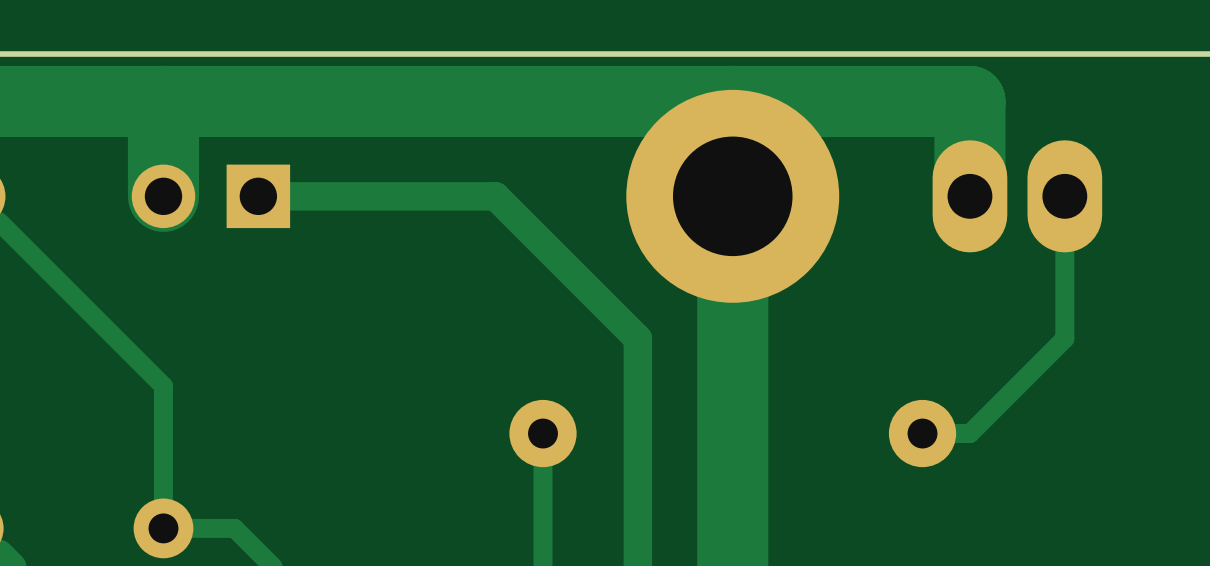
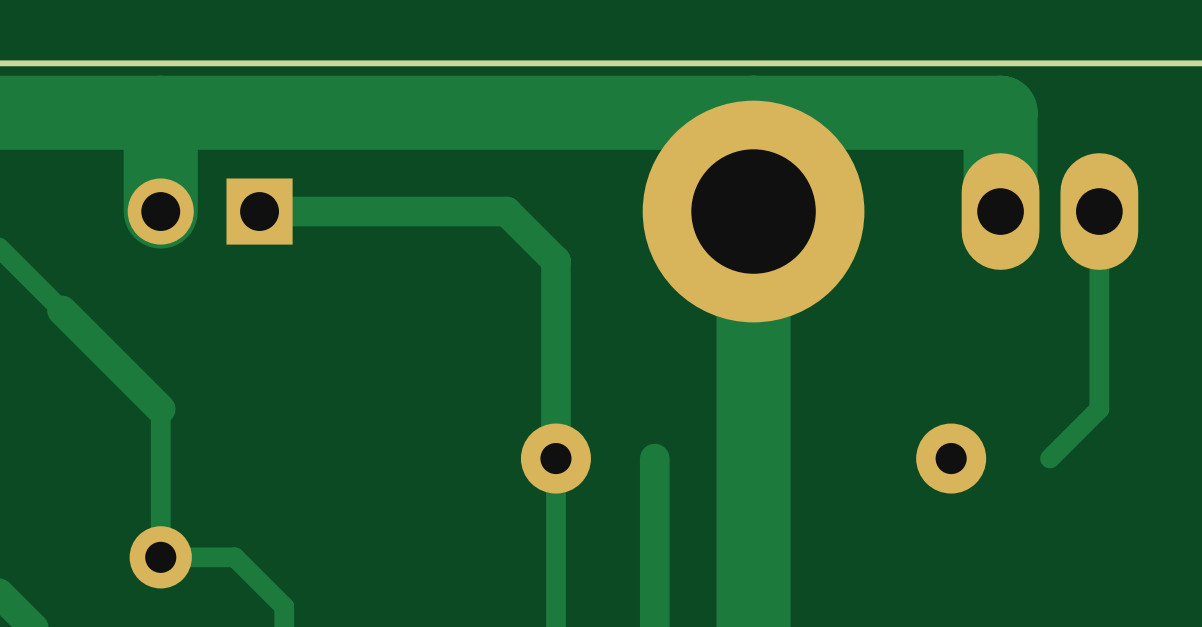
track: (543, 243) (637, 338) (637, 433) -> (555, 260) (555, 458)
track width: thin (68, 291) (163, 386) -> thick (61, 310) (160, 409)
track: (1064, 338) (969, 433) (922, 433) -> (1099, 359) (1099, 409) (1049, 458)

